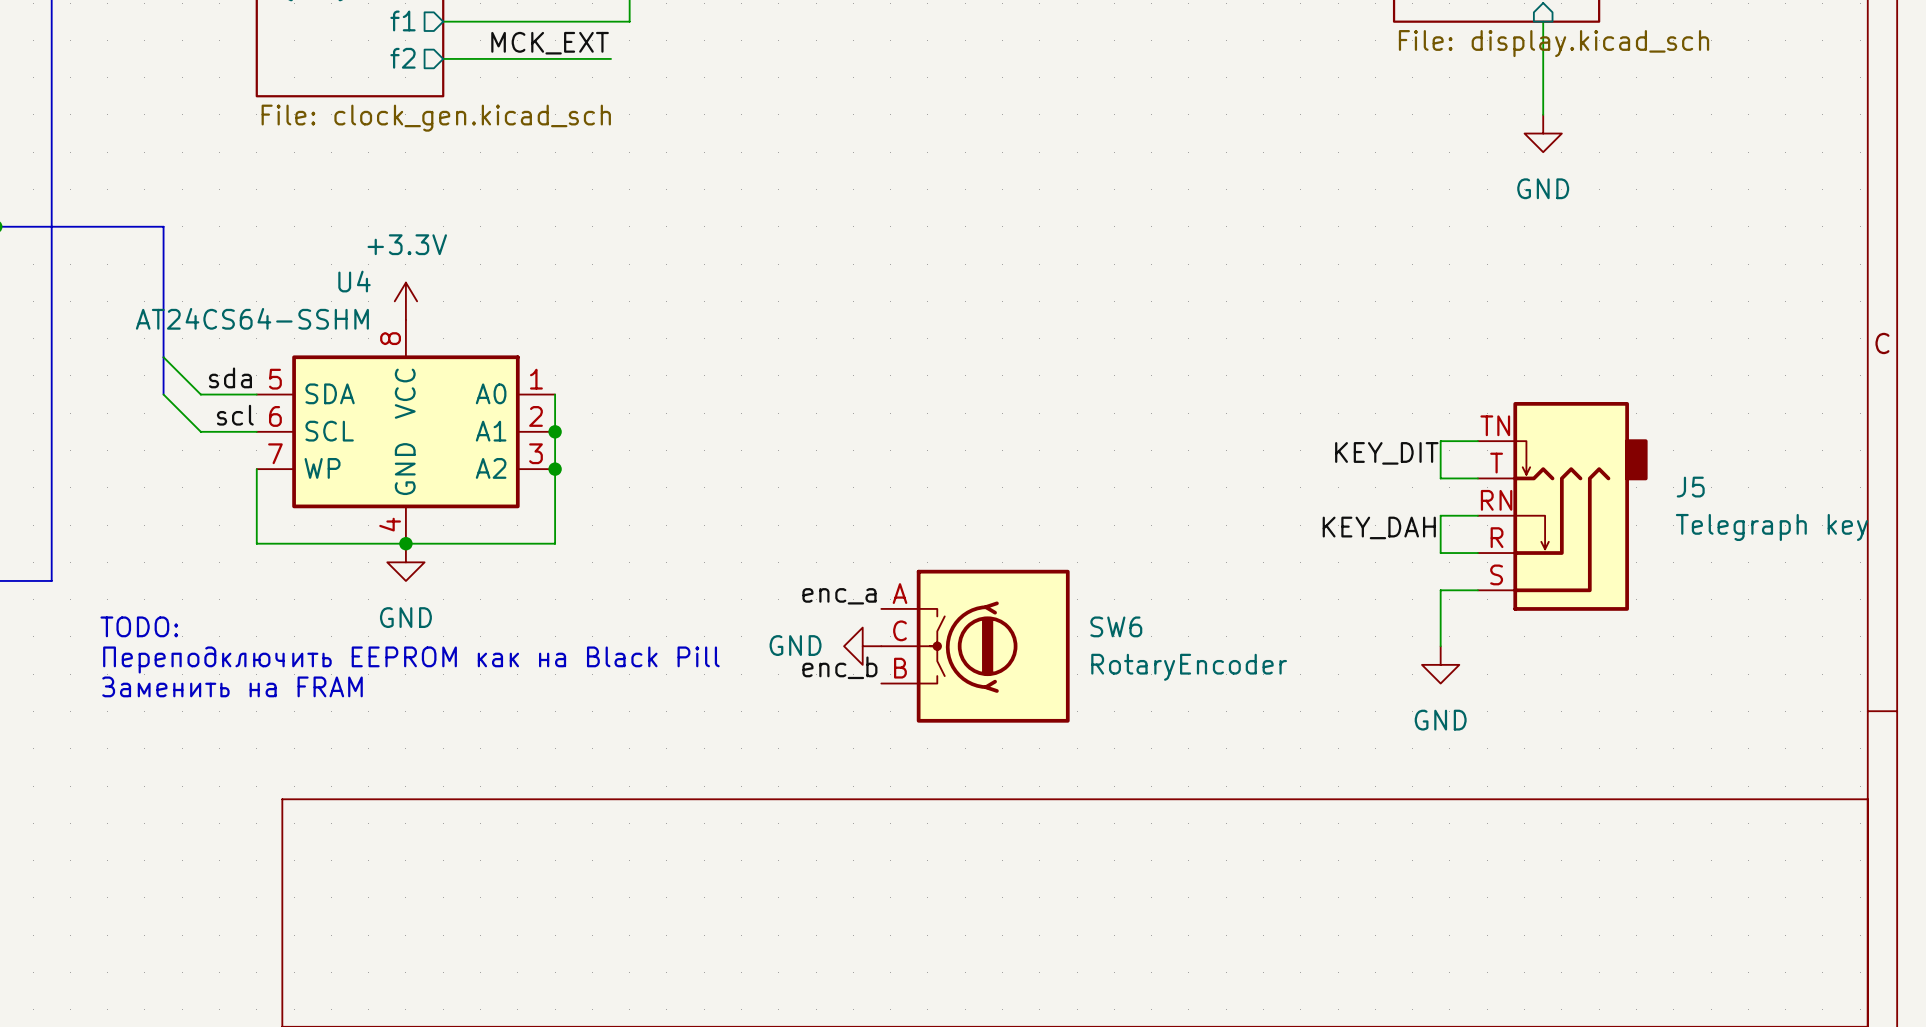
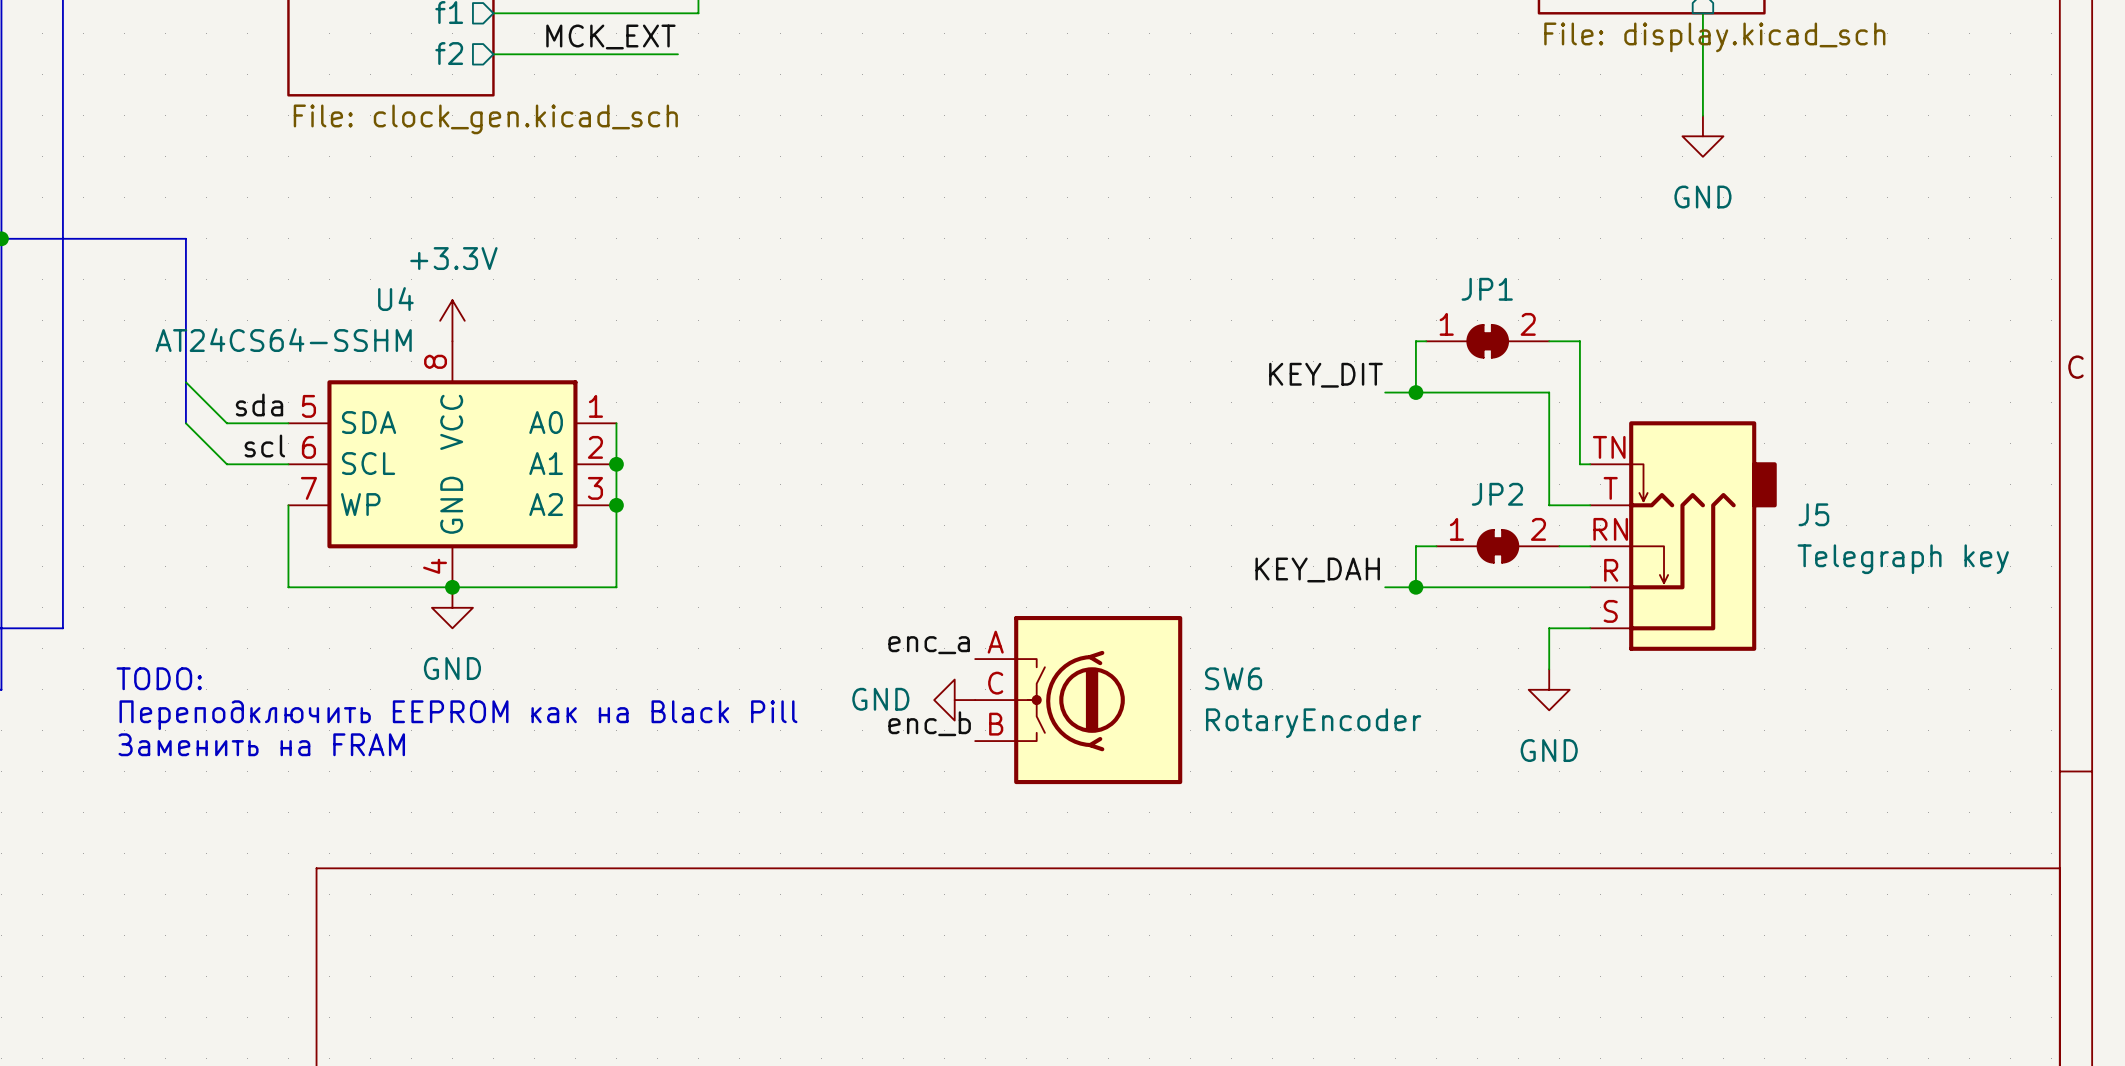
wire: none -> (1426, 341) (1415, 341) (1415, 392)
JP1: none -> (1487, 341)
wire: none -> (1549, 341) (1579, 341) (1579, 464) (1590, 464)
wire: none -> (1385, 392) (1549, 392) (1549, 505) (1590, 505)
junction: none -> (1415, 392)
wire: (1477, 441) (1440, 441) (1440, 478) (1477, 478) -> none
label position: KEY_DIT (1386, 453) -> KEY_DIT (1325, 375)
J5 name position: J5 (1690, 487) -> J5 (1813, 514)
wire: none -> (1436, 546) (1415, 546) (1415, 587)
JP2: none -> (1497, 546)
wire: none -> (1559, 546) (1590, 546)
J5 position: (1562, 506) -> (1683, 536)
wire: (1477, 515) (1440, 515) (1440, 553) (1477, 553) -> none
label position: KEY_DAH (1379, 527) -> KEY_DAH (1317, 569)
J5 value position: Telegraph key (1771, 527) -> Telegraph key (1903, 559)
wire: none -> (1385, 587) (1590, 587)
junction: none -> (1415, 587)
wire: none -> (1590, 628) (1549, 628) (1549, 669)
wire: (1477, 590) (1440, 590) (1440, 646) -> none
power symbol position: GND (1440, 664) -> GND (1549, 689)

